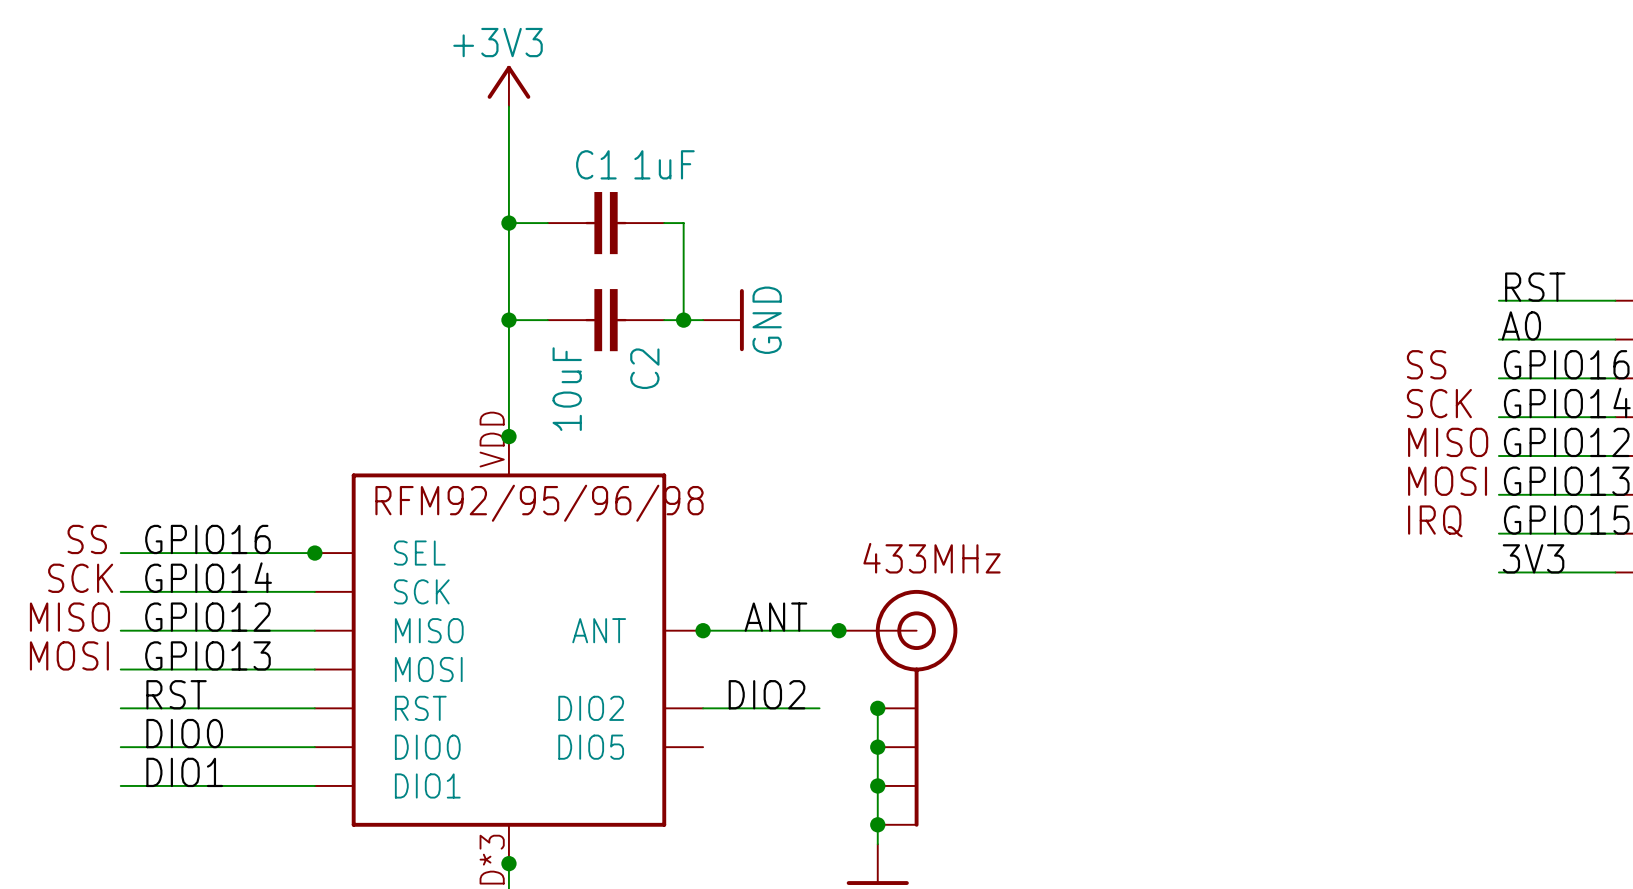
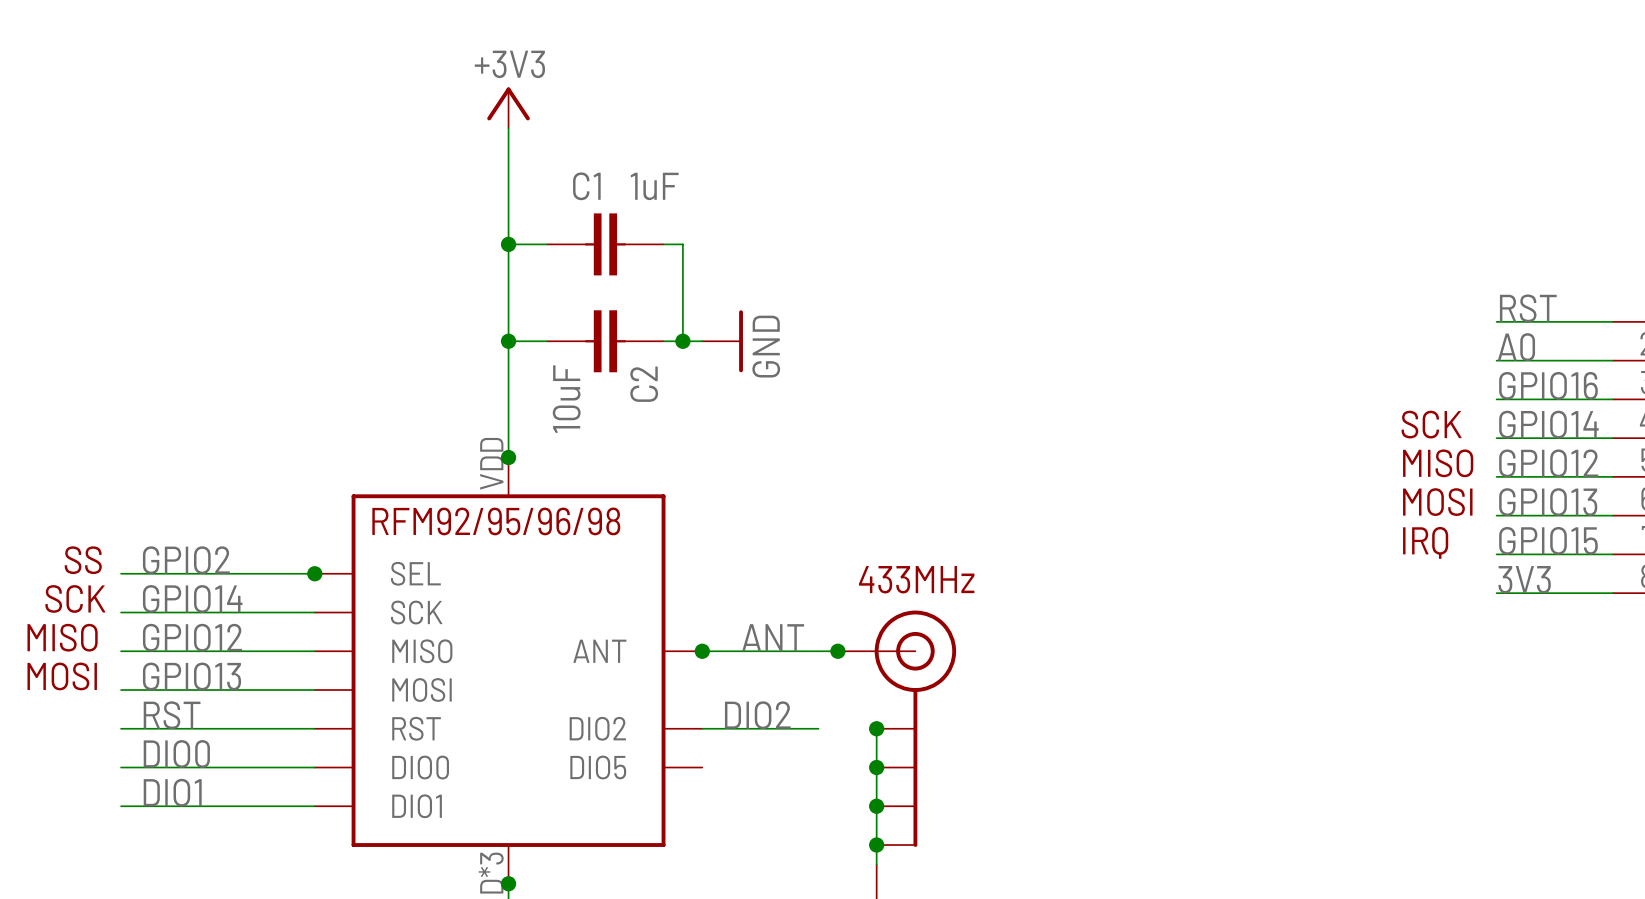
text: SS (1426, 364) -> none
label: GPIO16 (207, 539) -> GPIO2 (186, 560)

